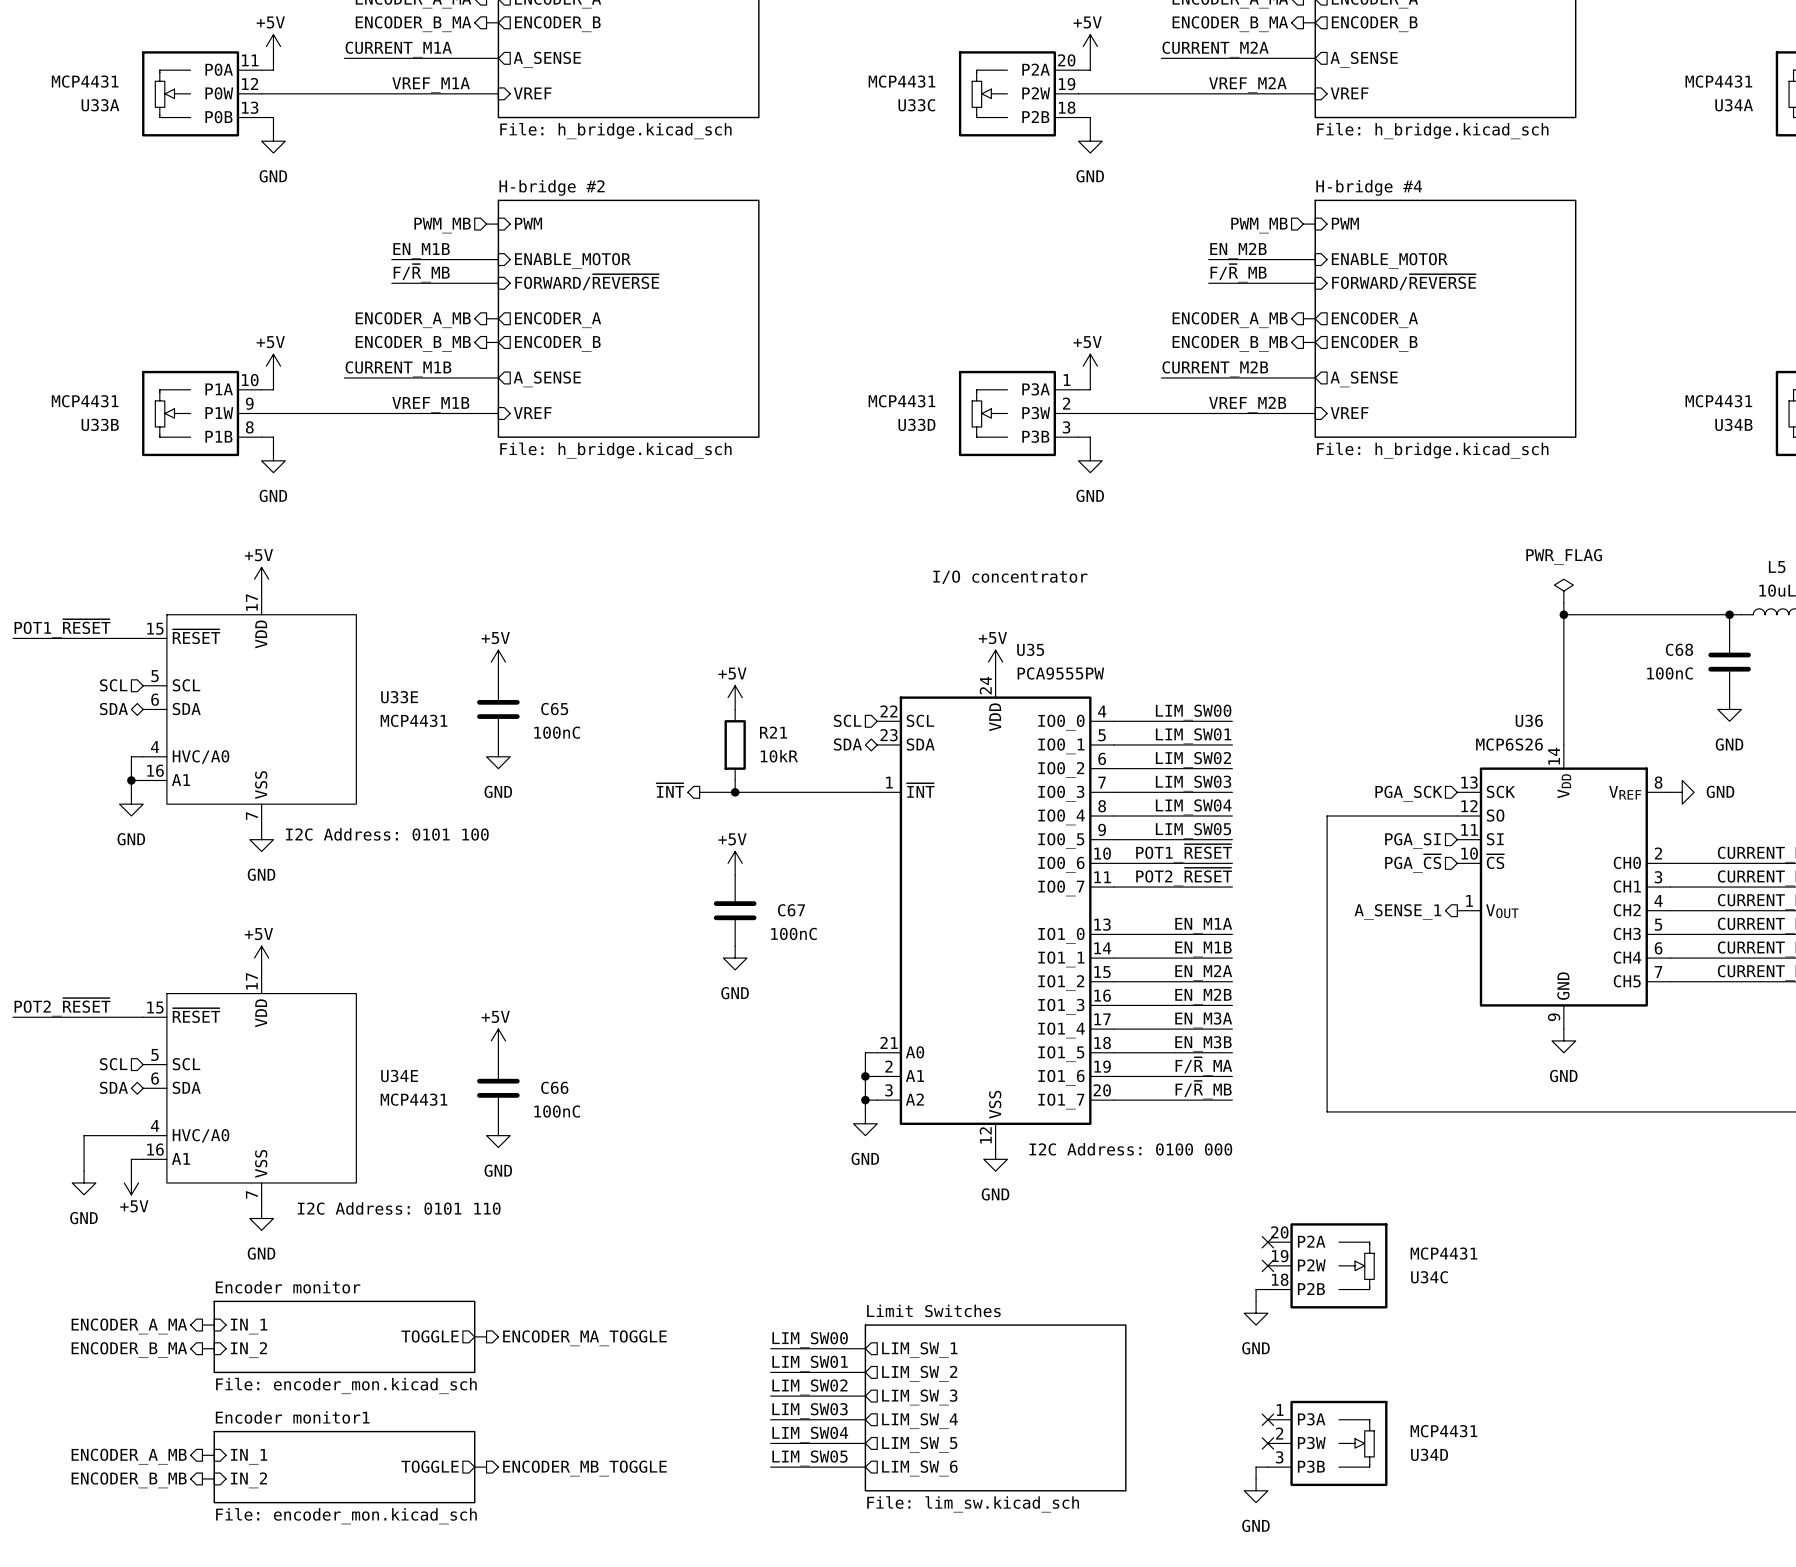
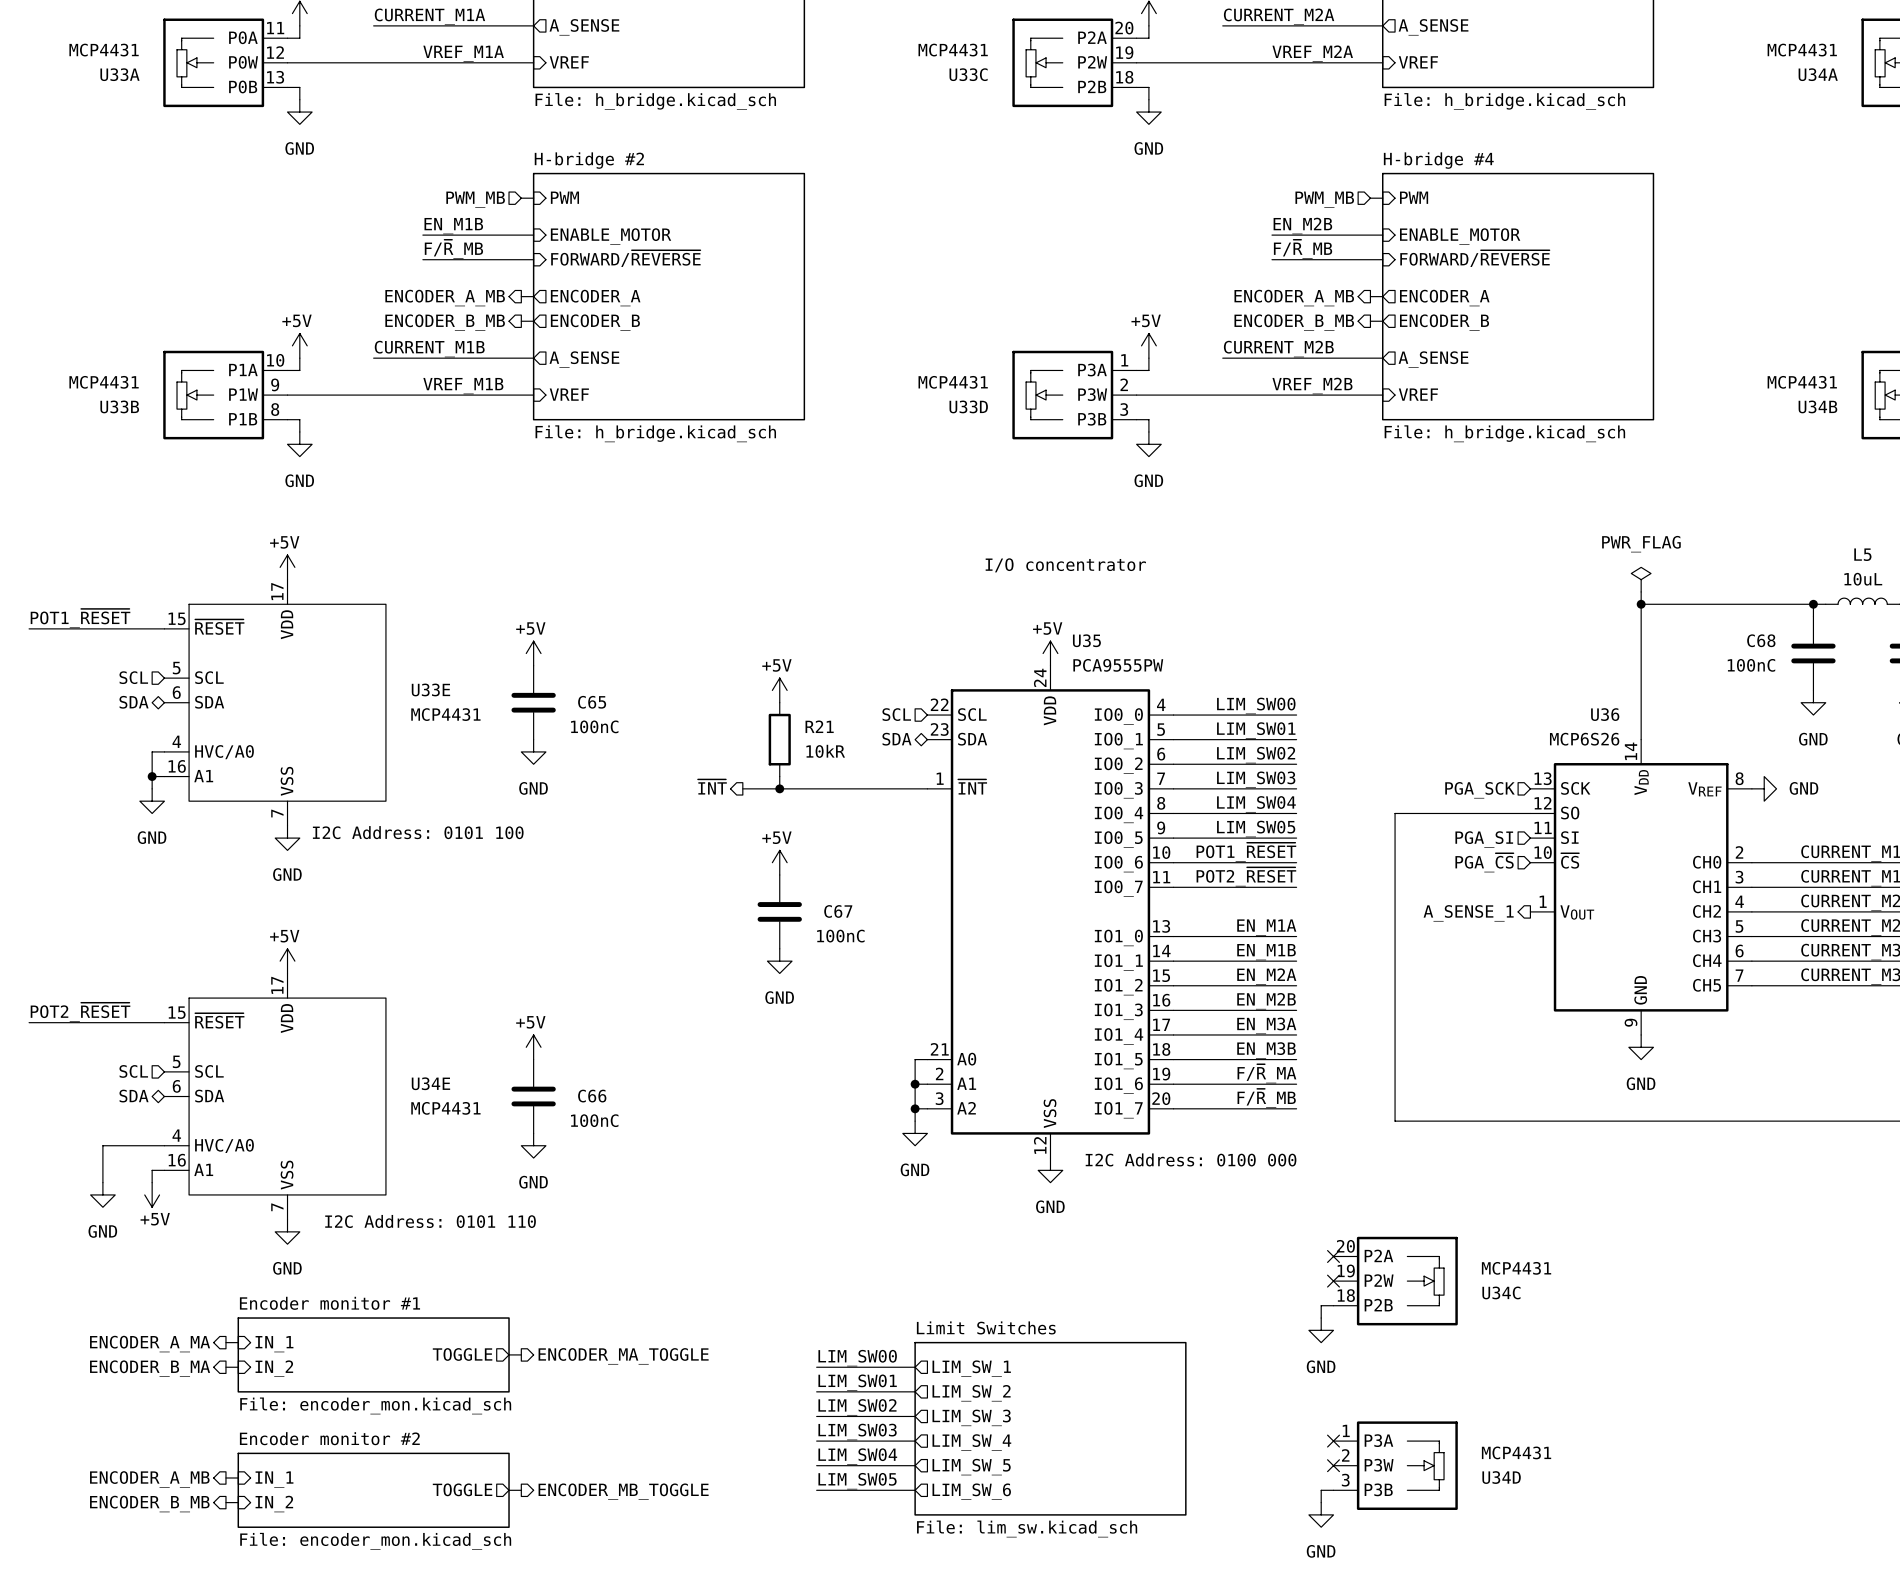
sheet Encoder monitor name: Encoder monitor (288, 1287) -> Encoder monitor #1 (329, 1303)
sheet Encoder monitor1 name: Encoder monitor1 (292, 1417) -> Encoder monitor #2 (329, 1438)

